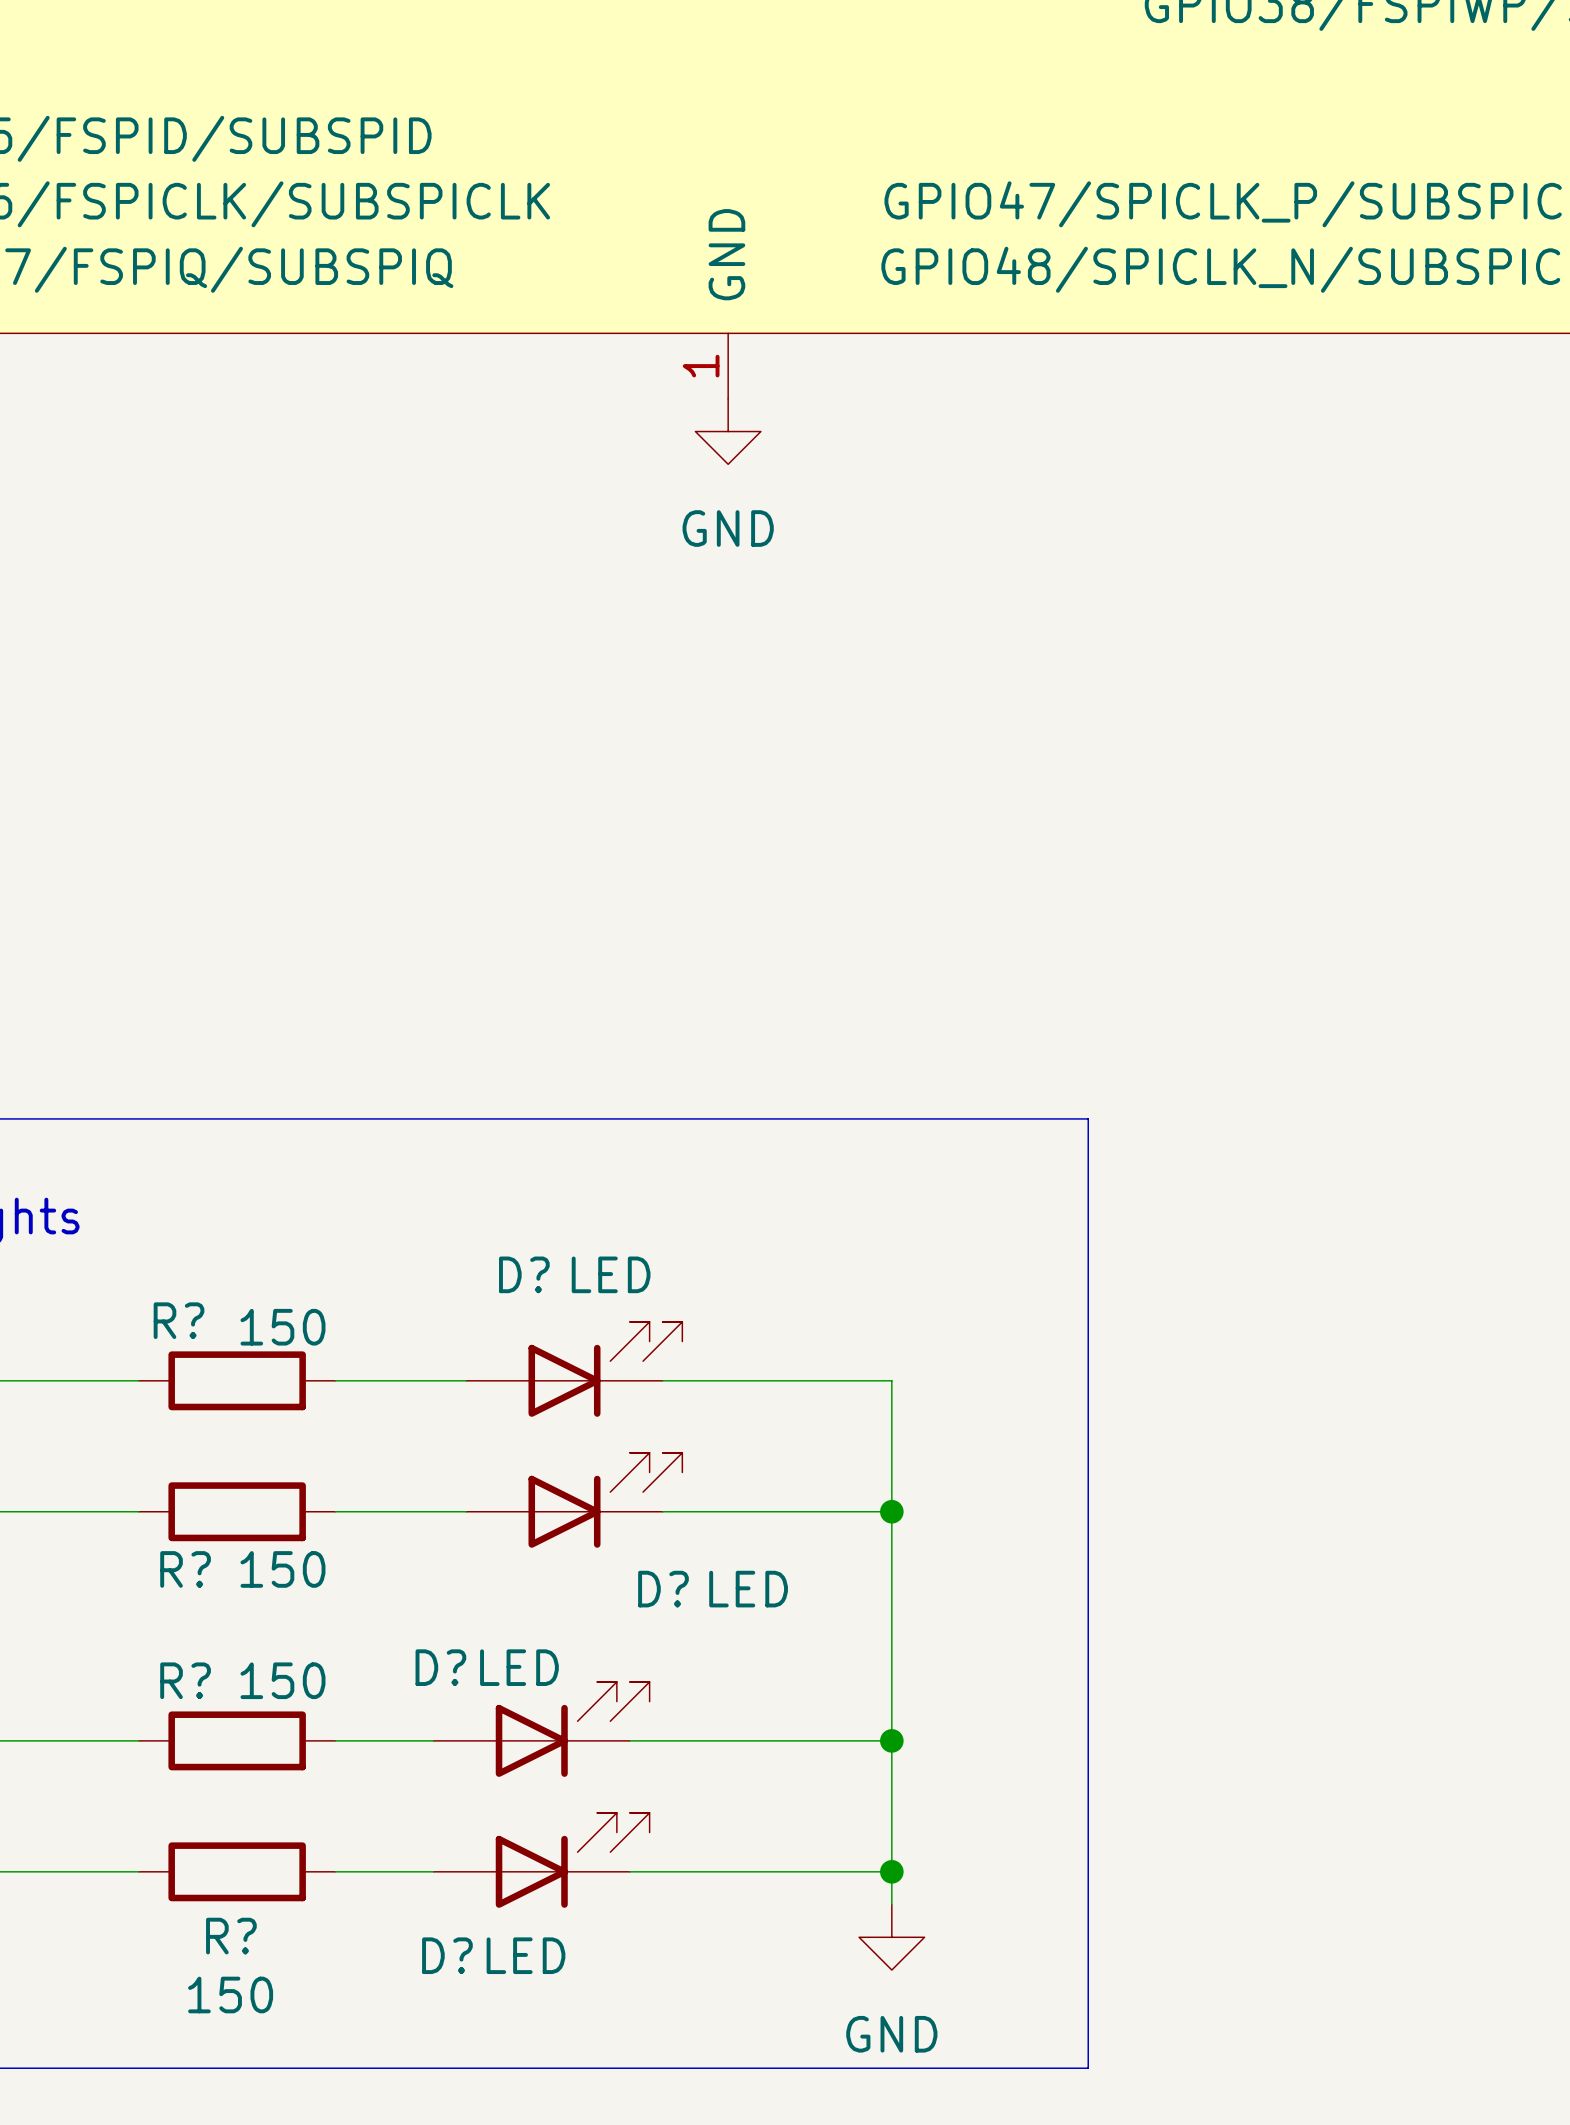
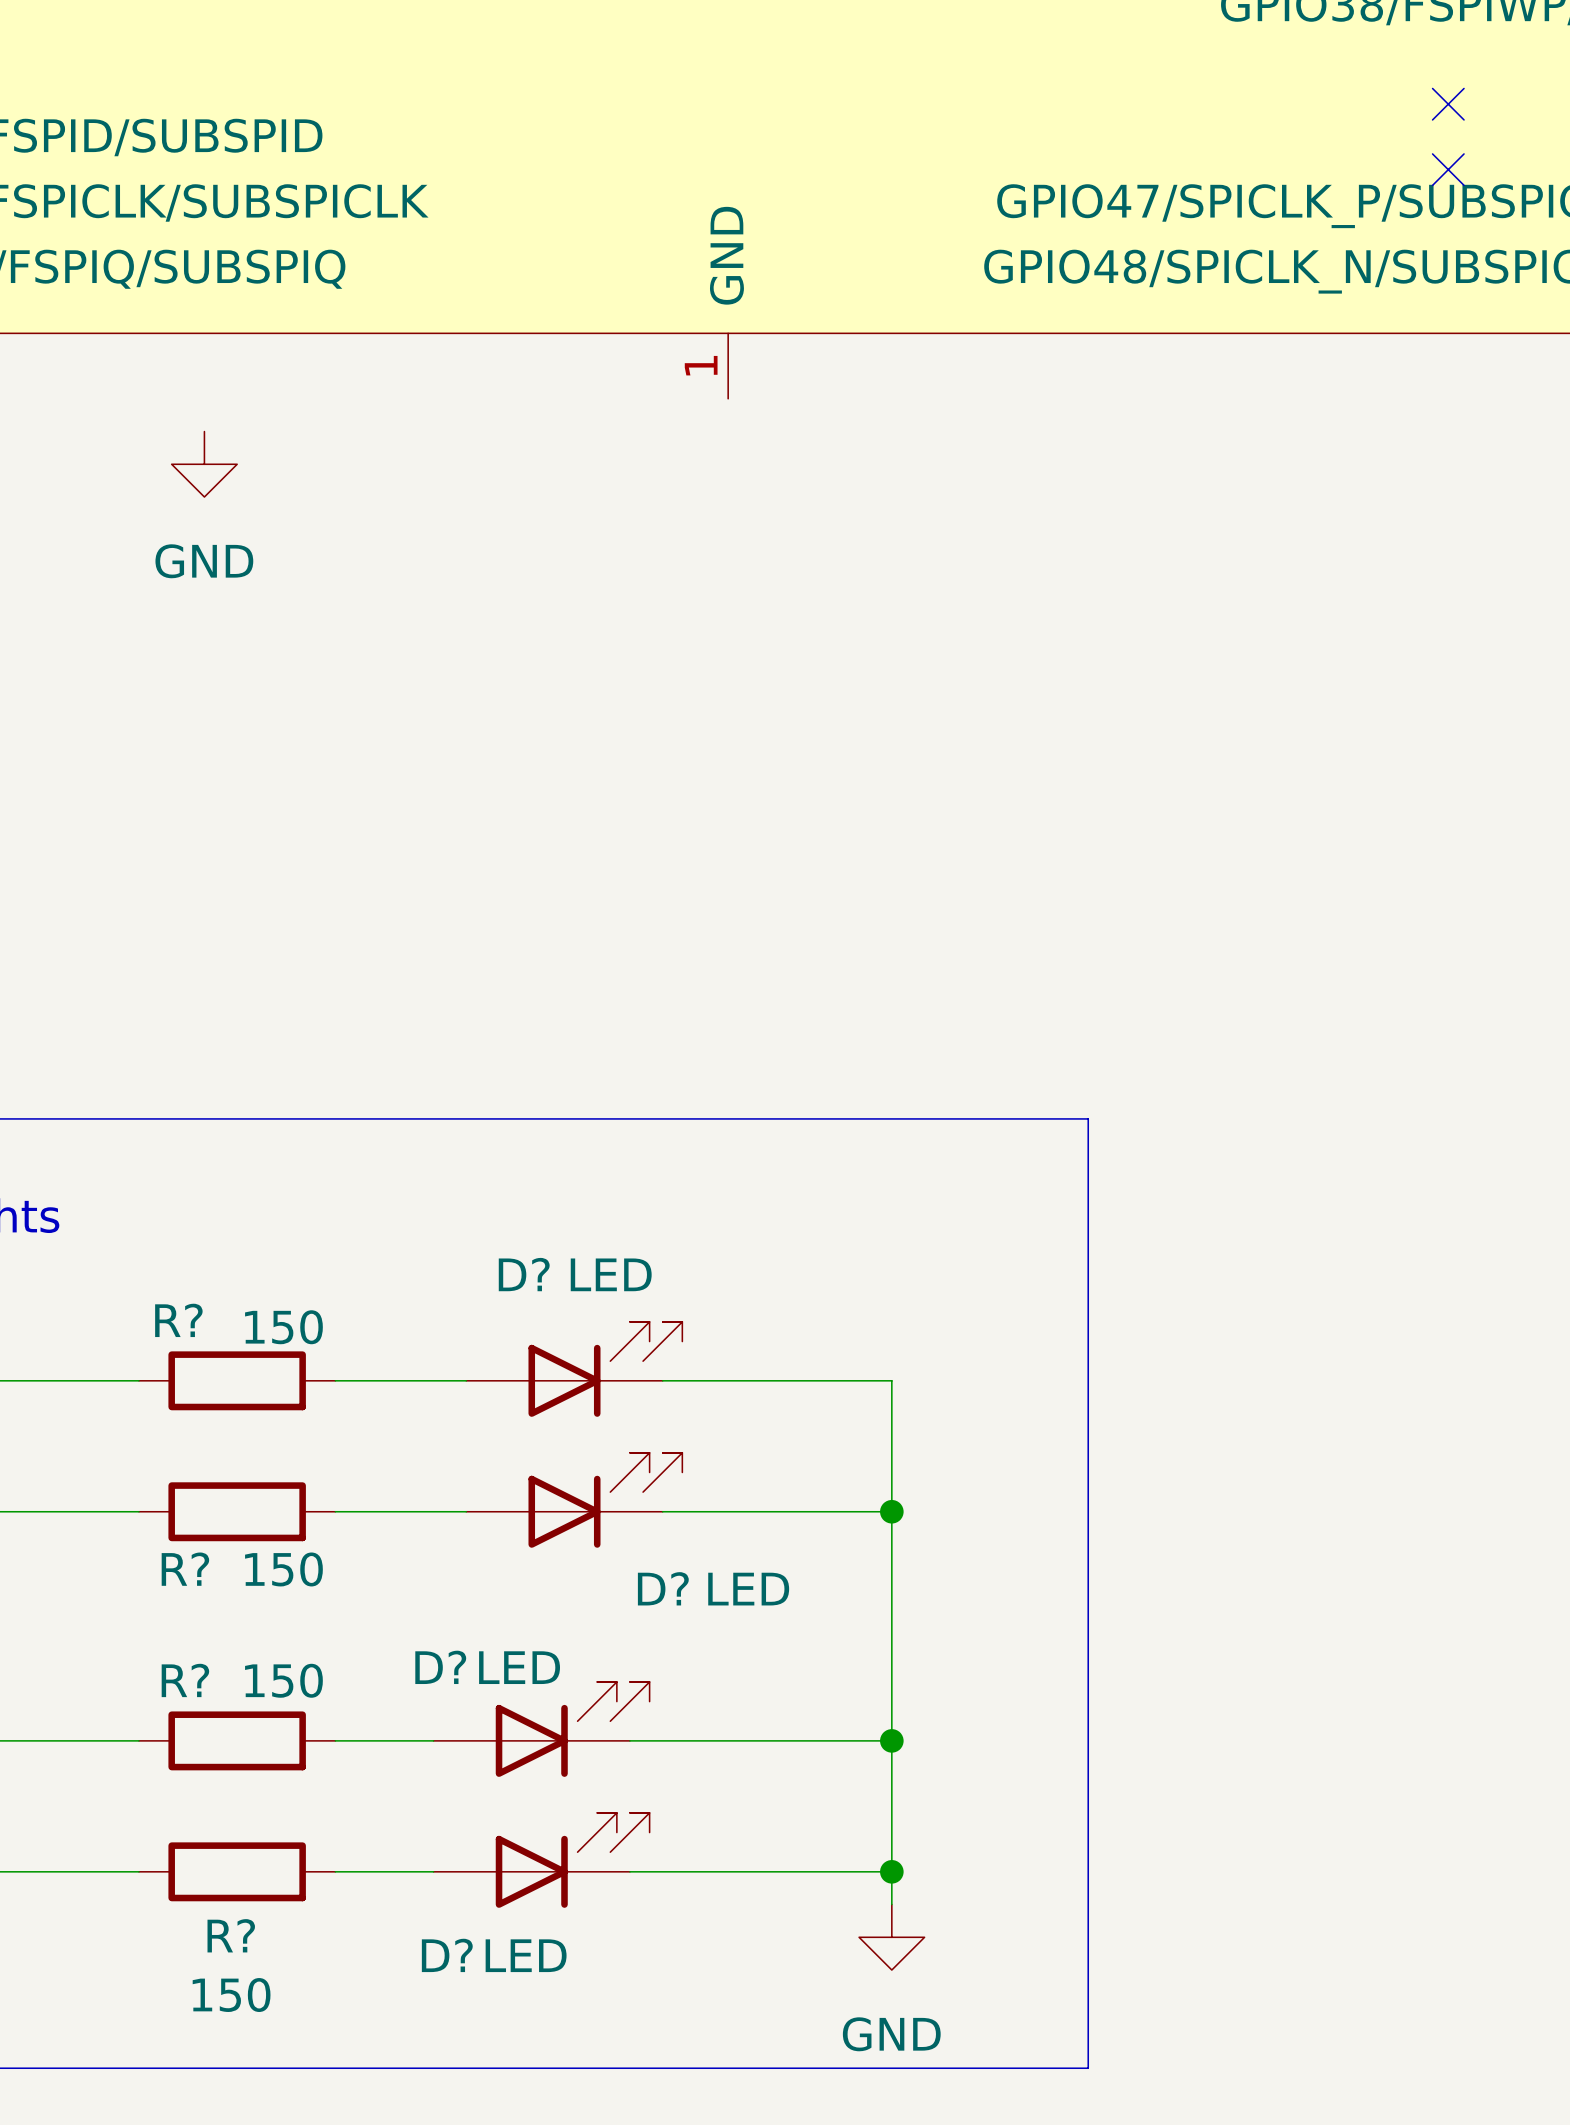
no-connect mark: none -> (1448, 104)
no-connect mark: none -> (1448, 169)
power symbol position: GND (728, 431) -> GND (204, 464)

